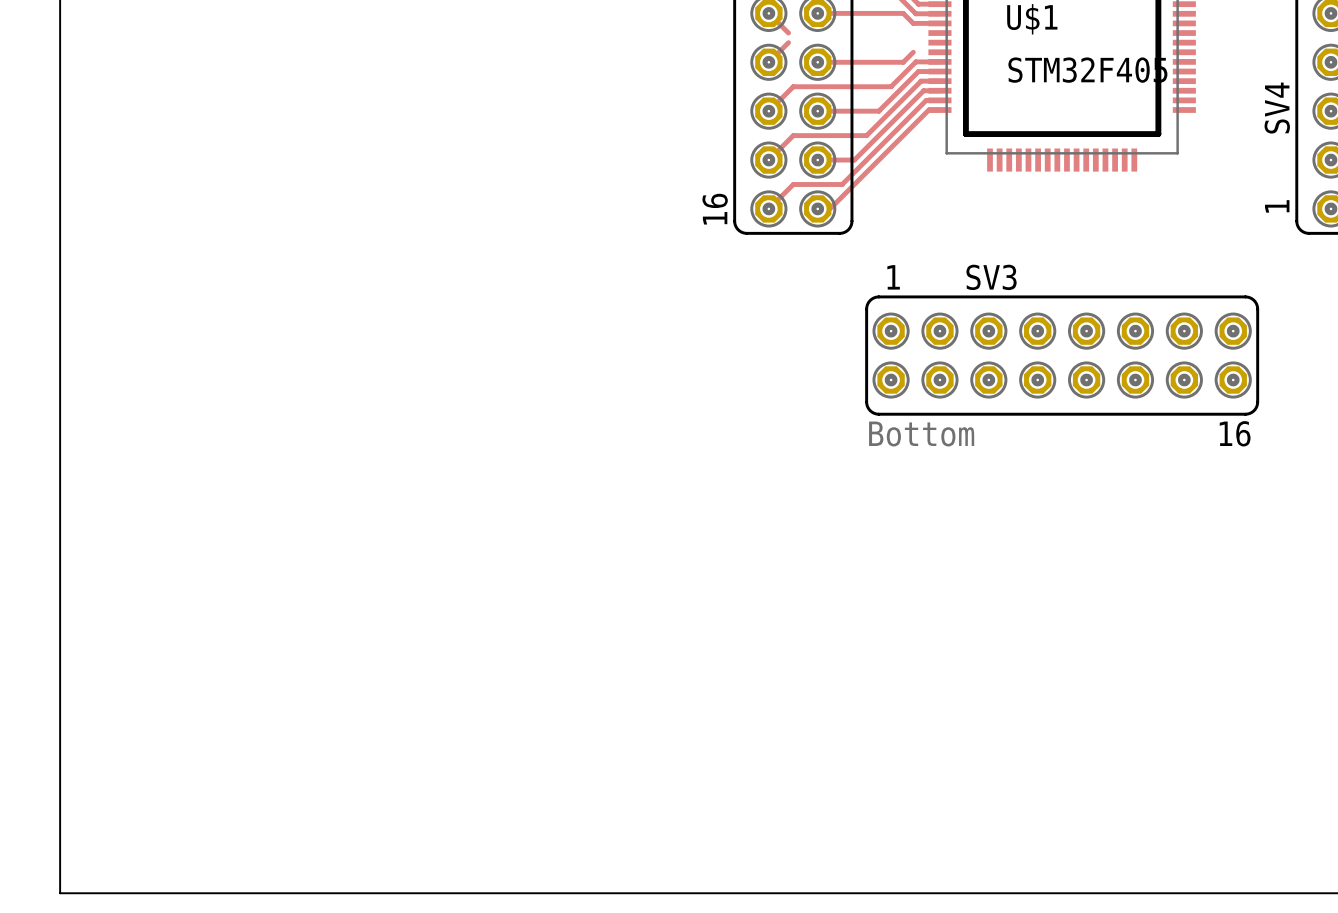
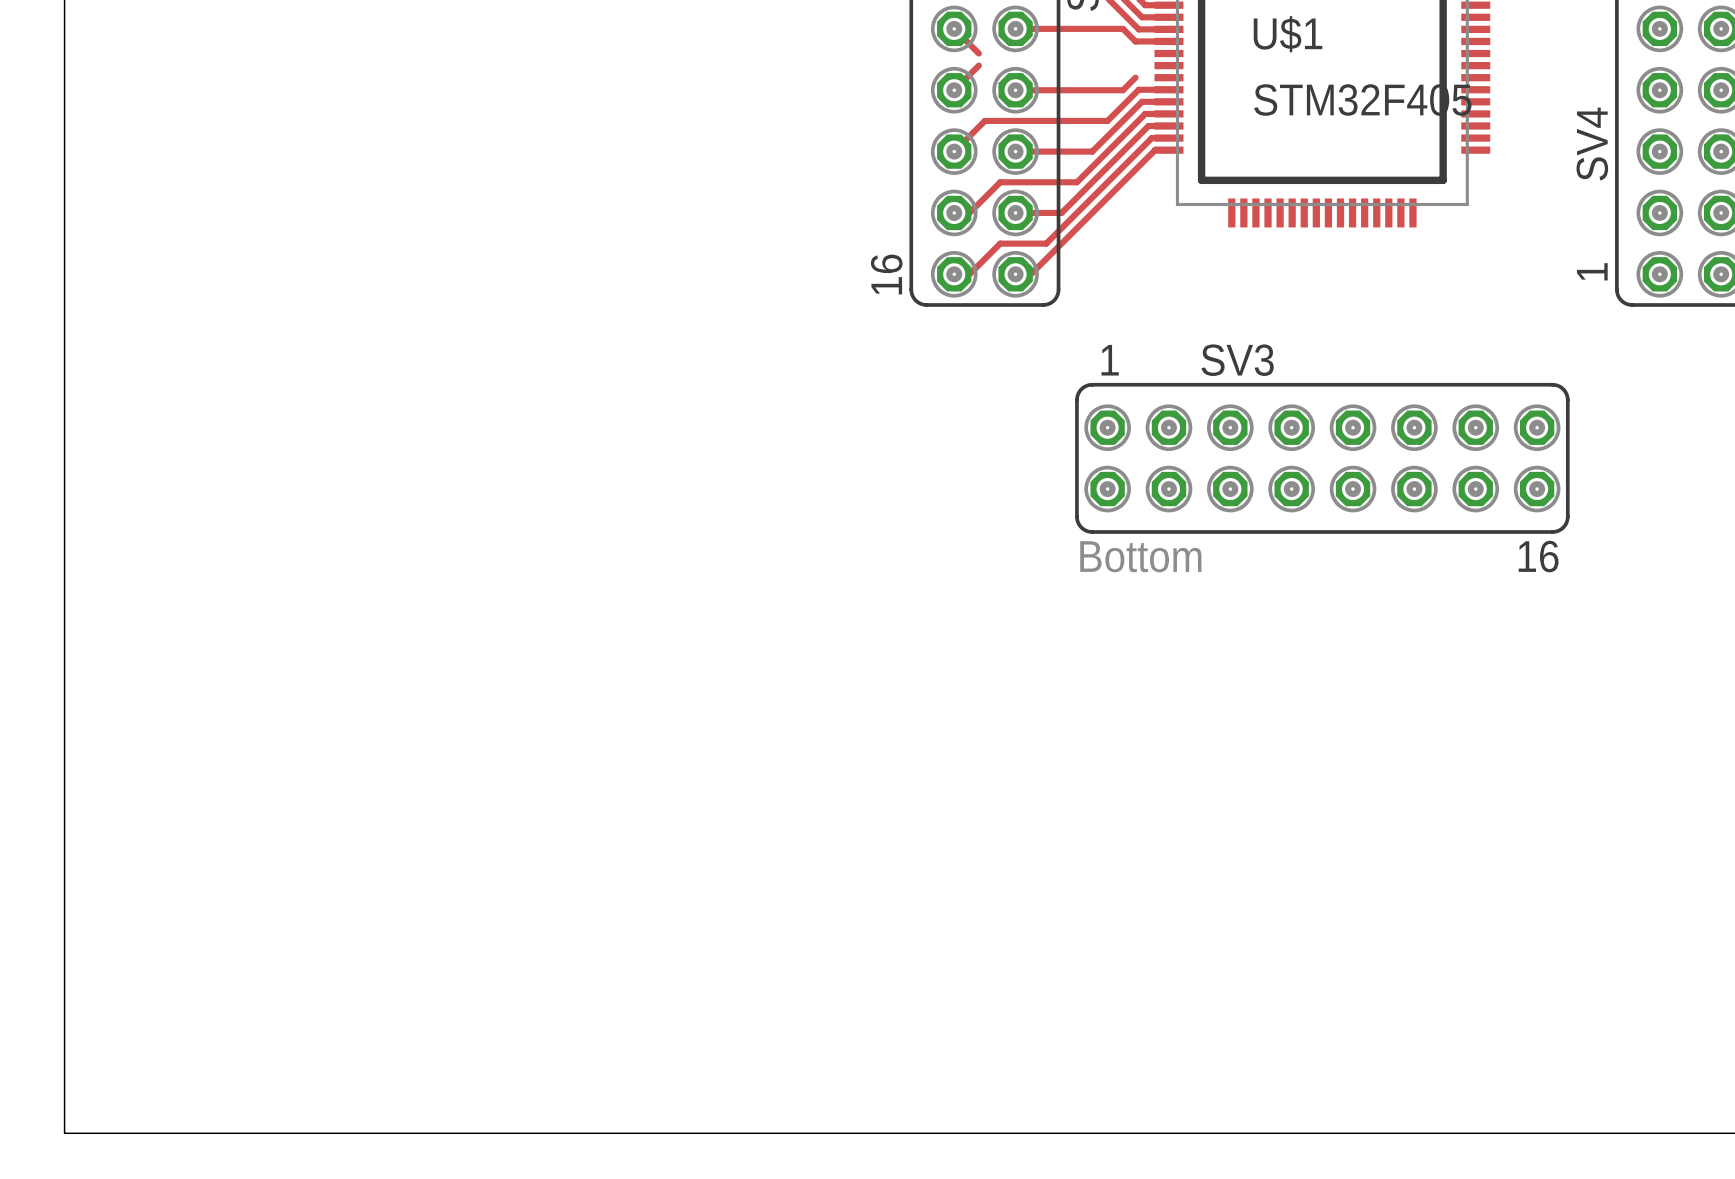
top track: (805, 135) (793, 135) (768, 160) -> (1000, 182) (969, 212)
top track: (805, 184) (793, 184) (768, 208) -> (1000, 243) (969, 274)

